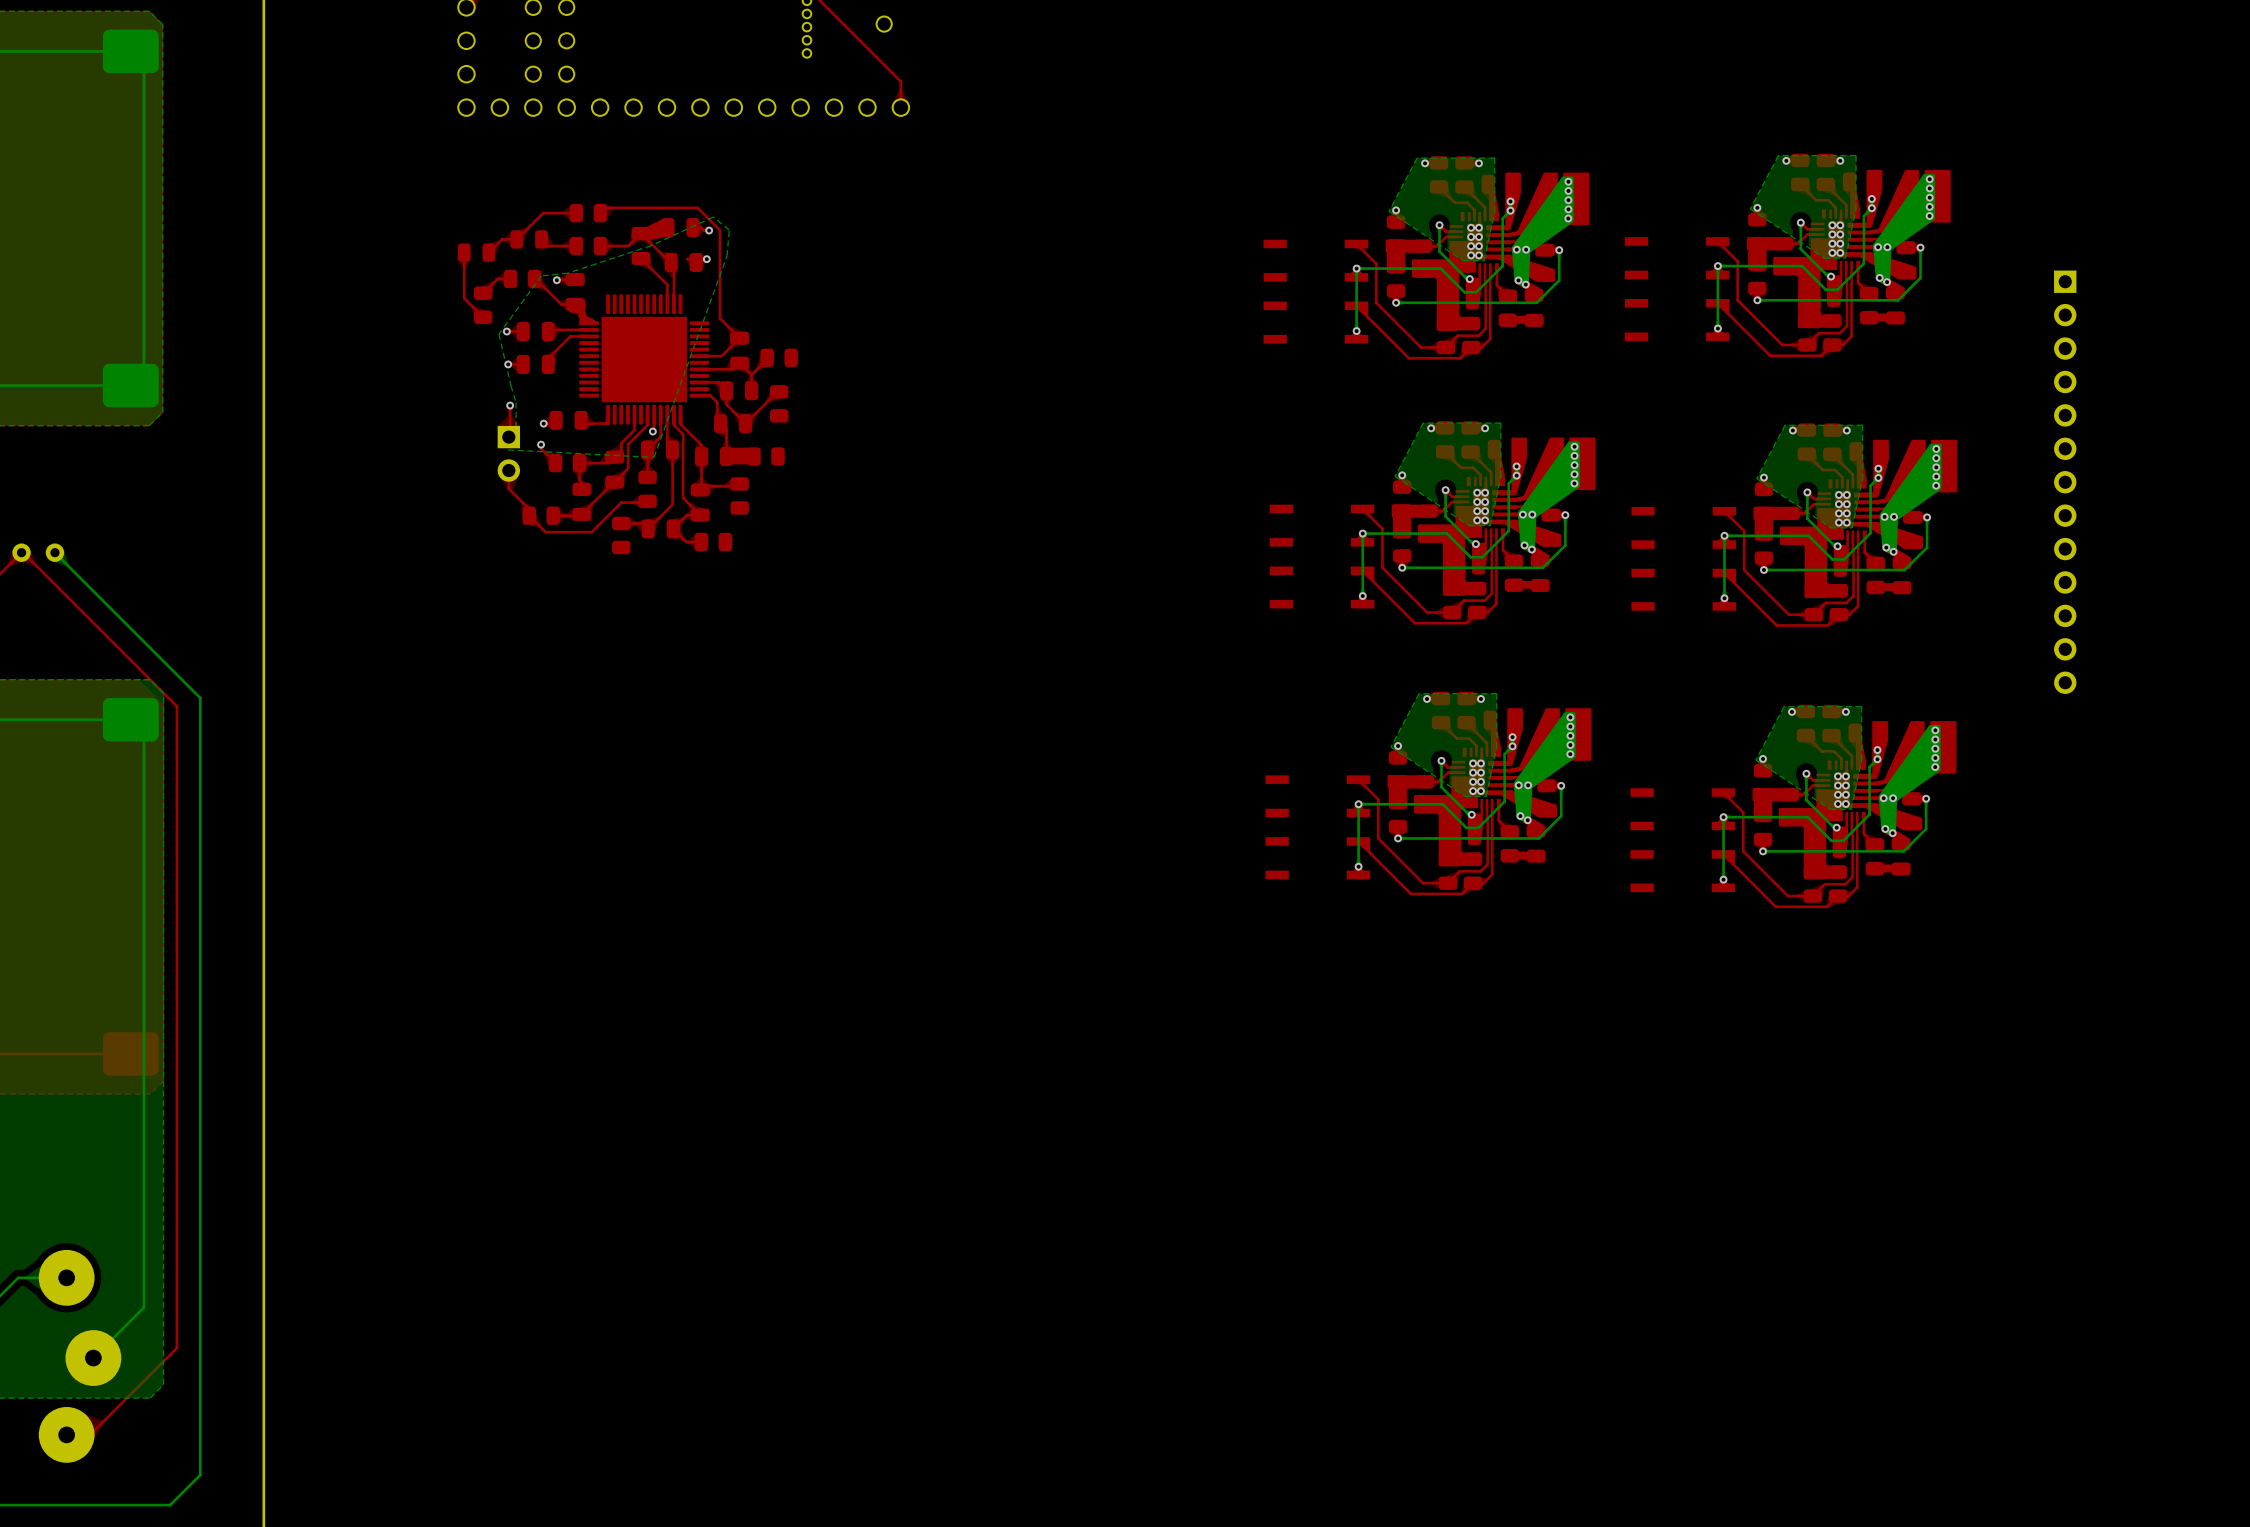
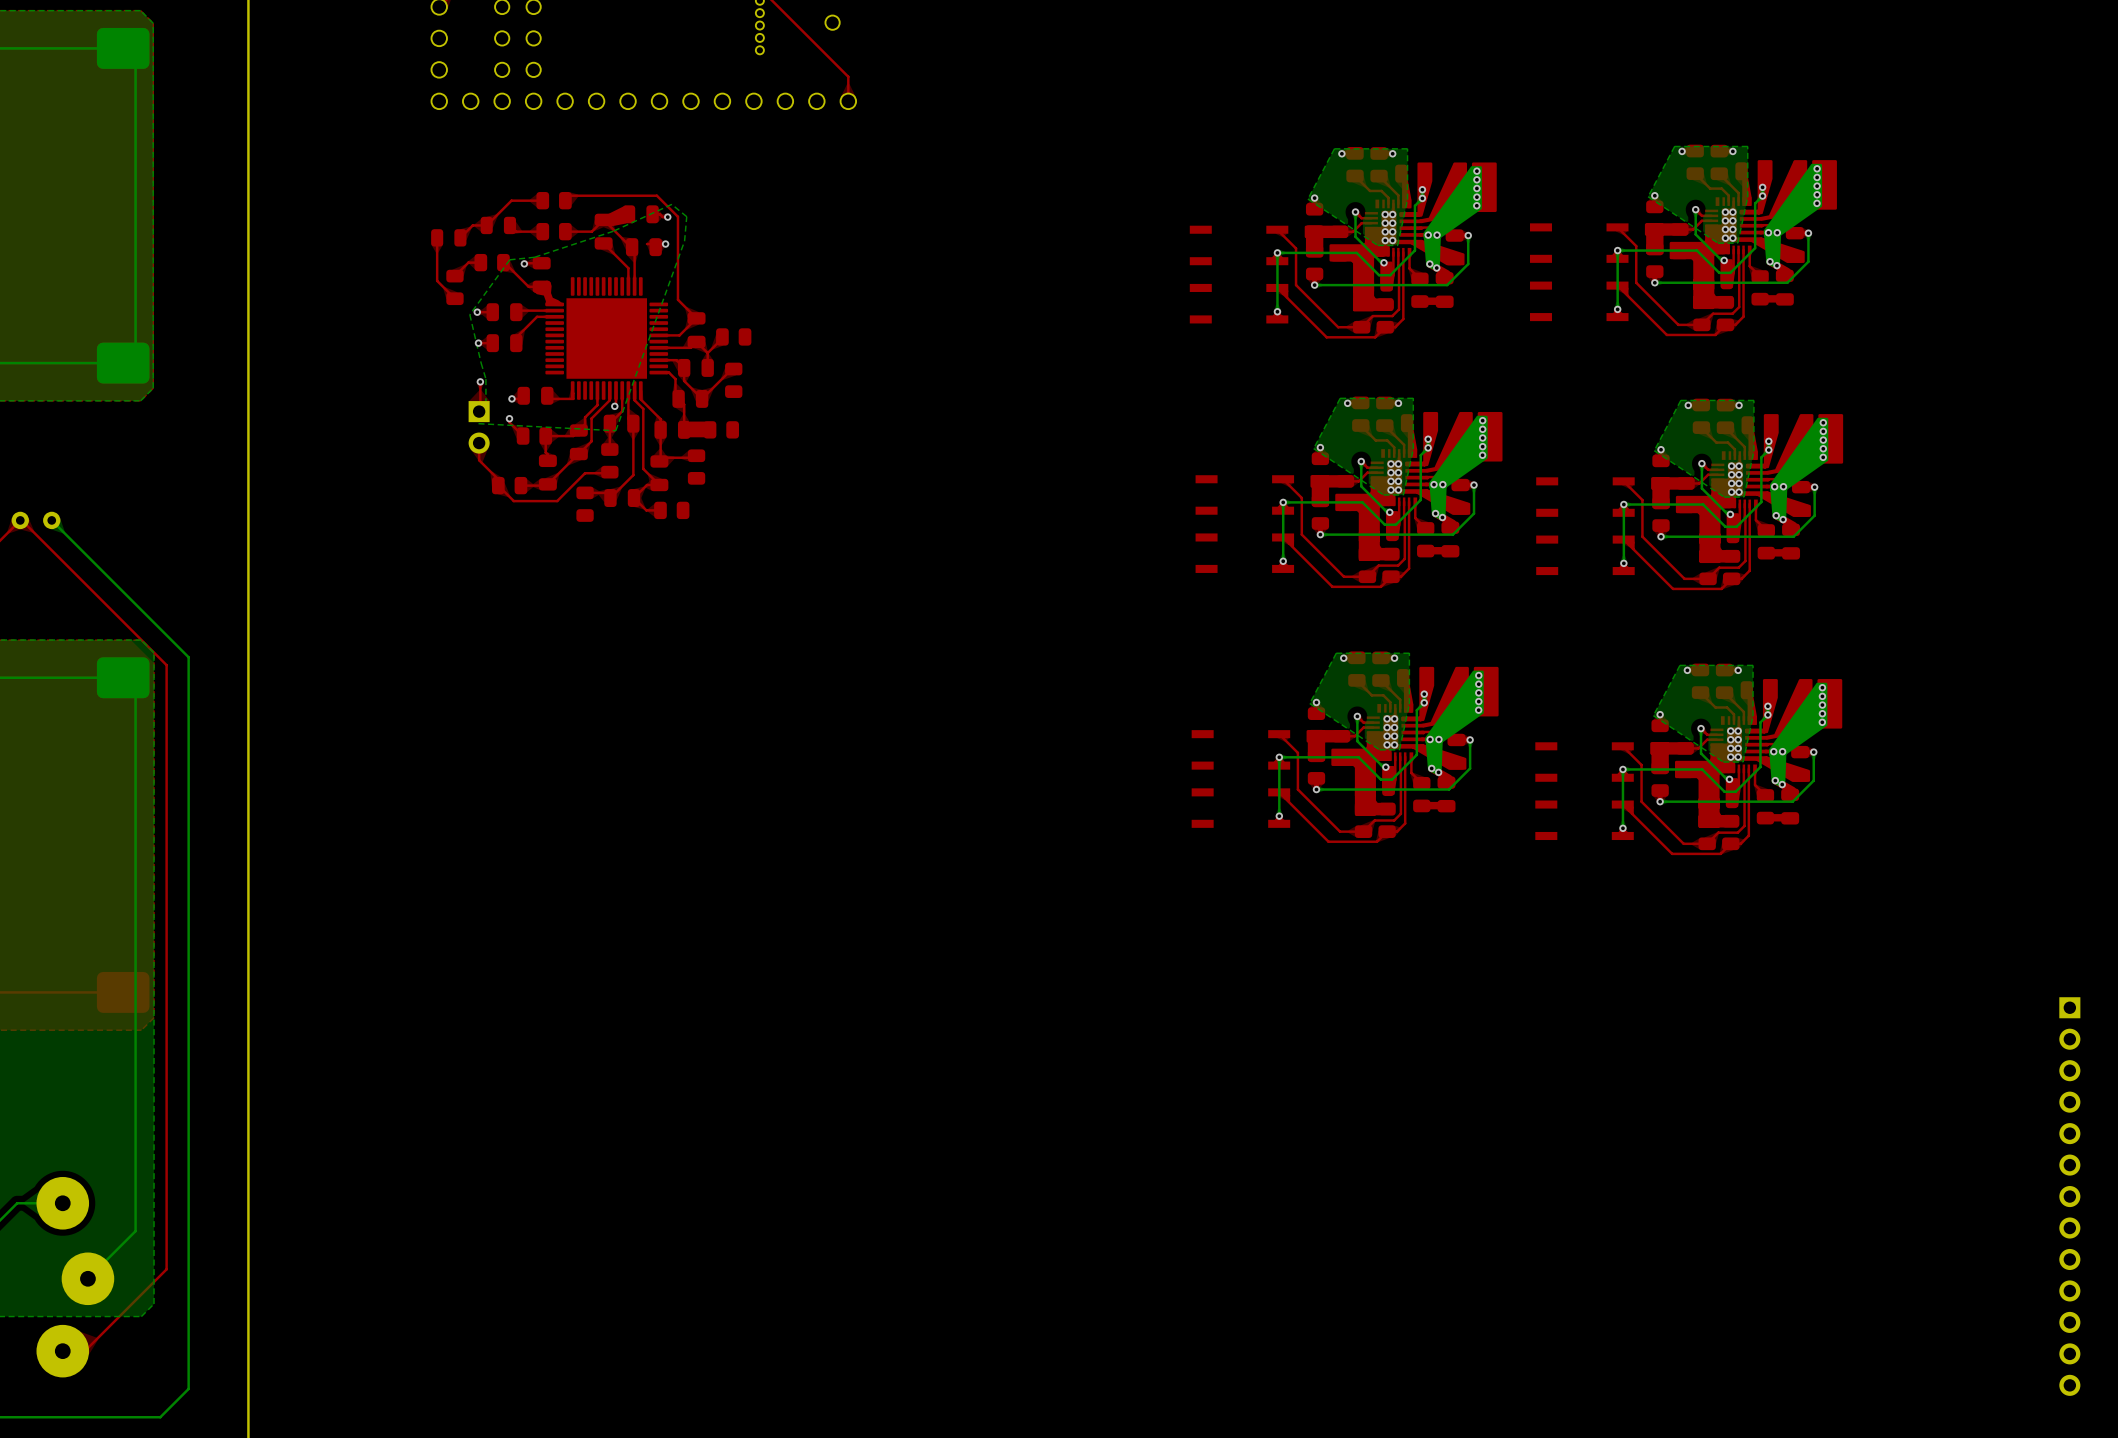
part: (2065, 482) -> none
part: none -> (2069, 1196)

